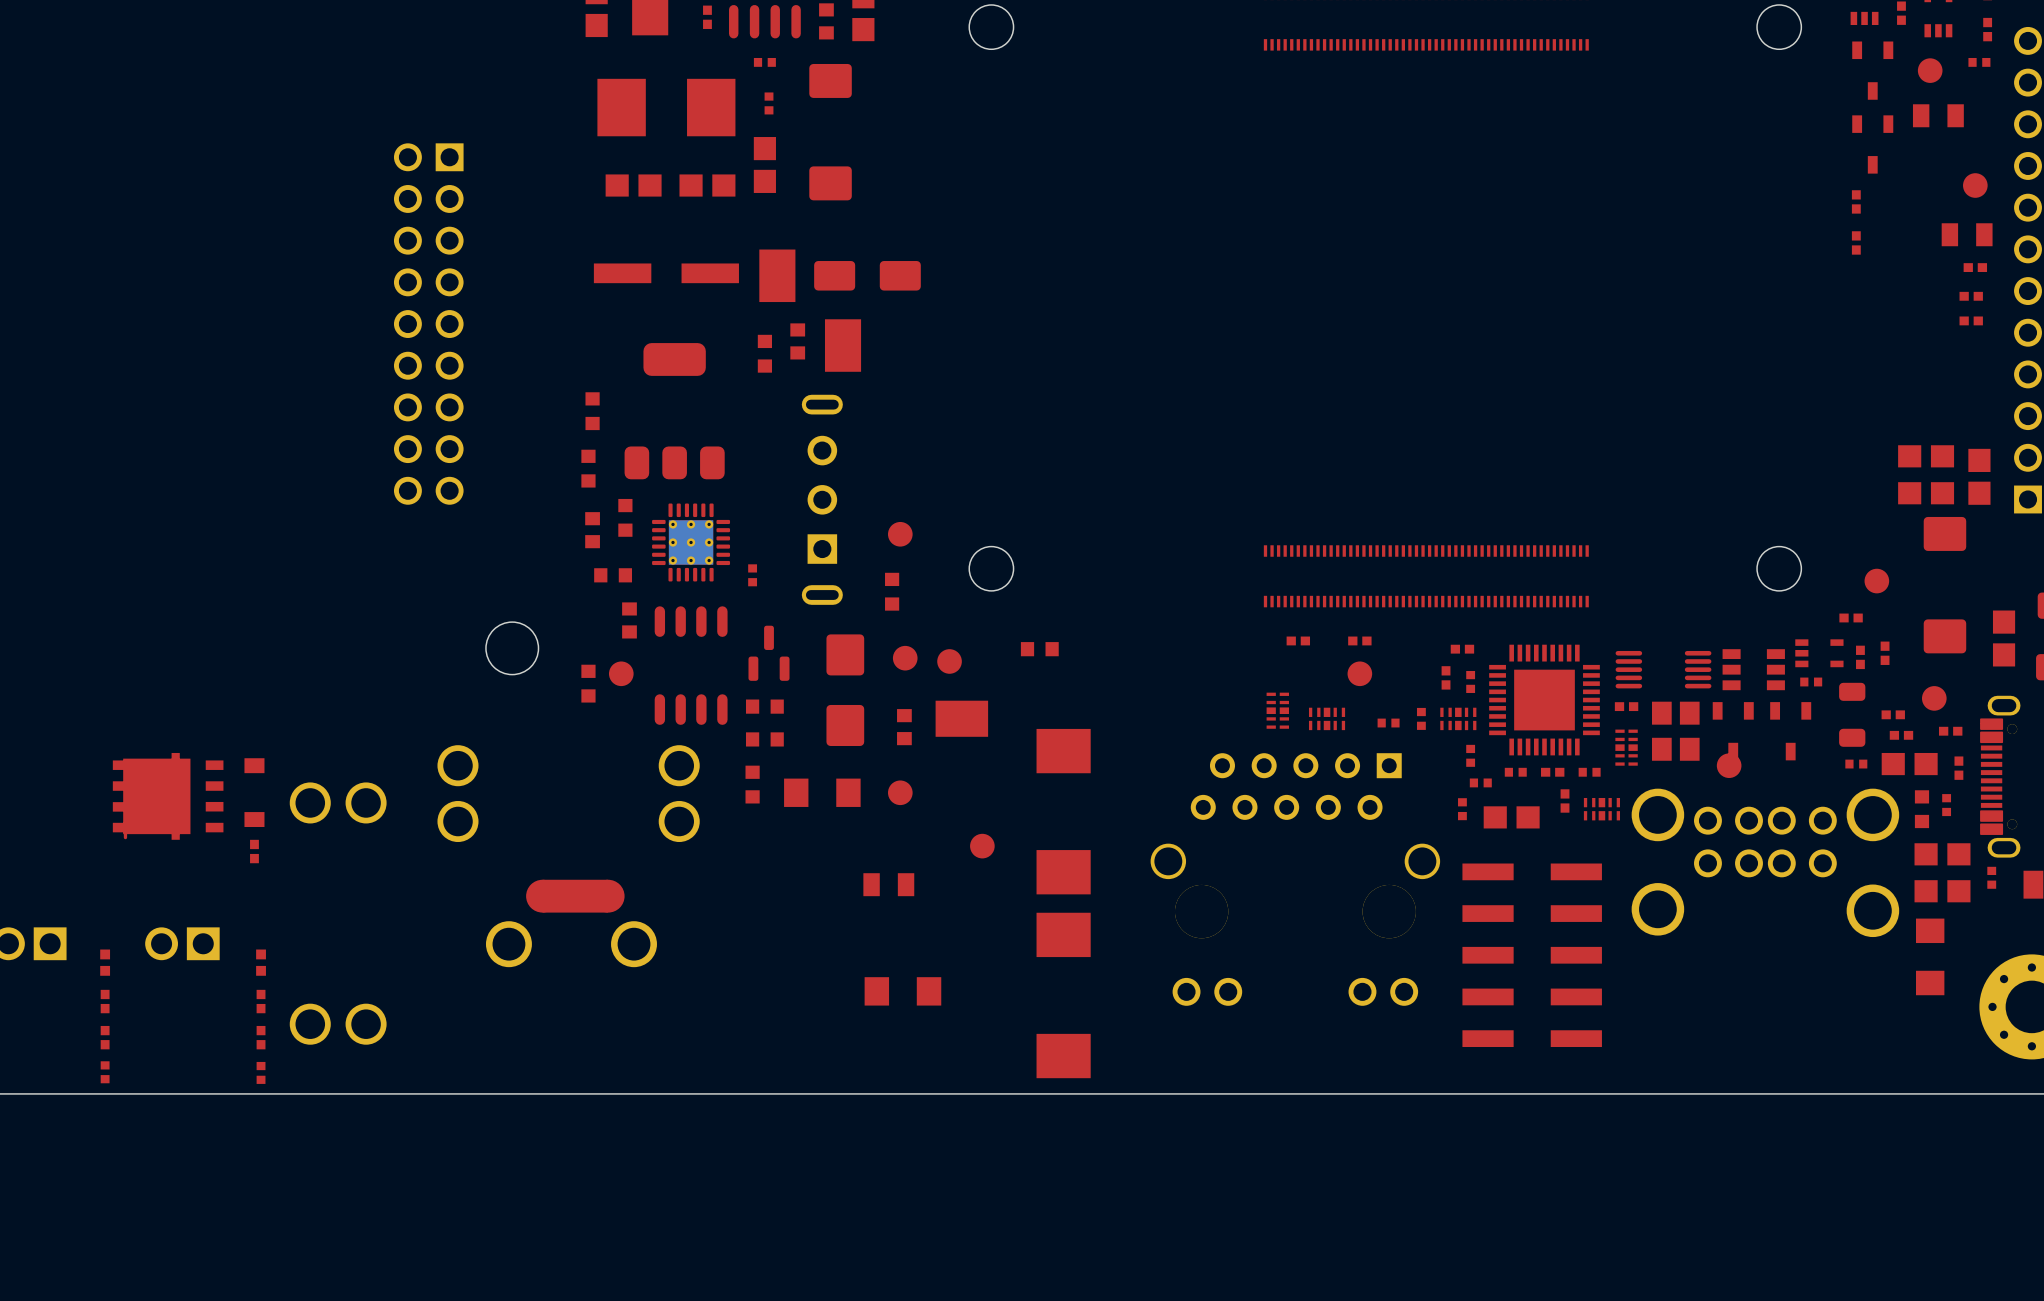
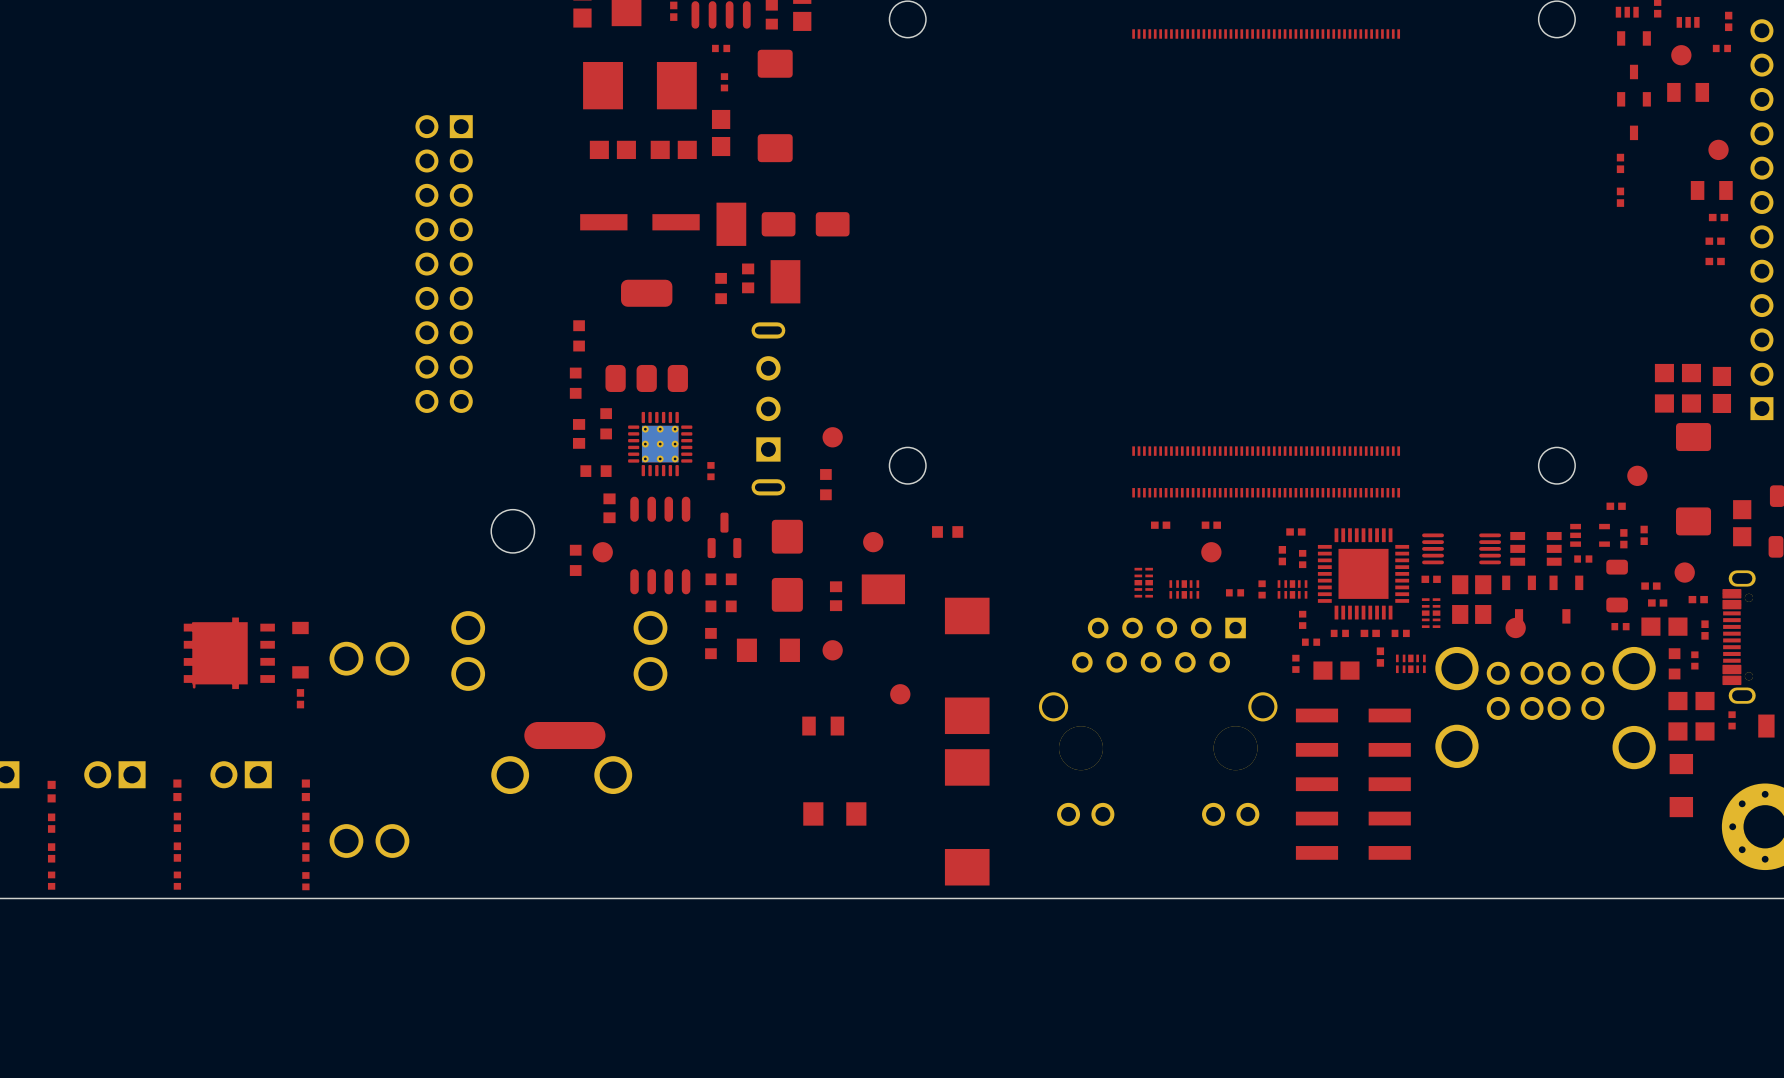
part: (905, 658) -> none

